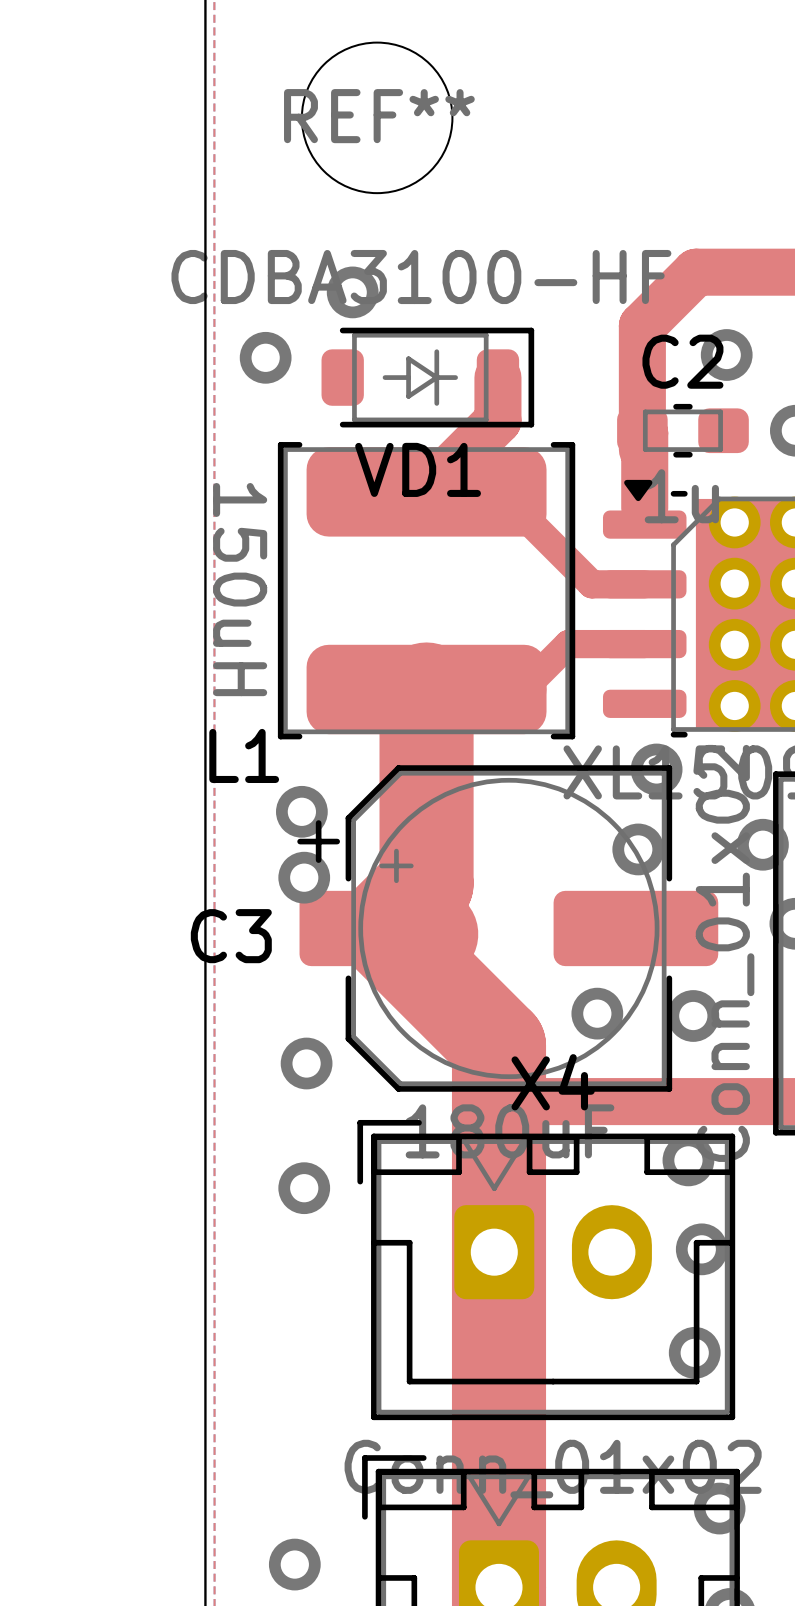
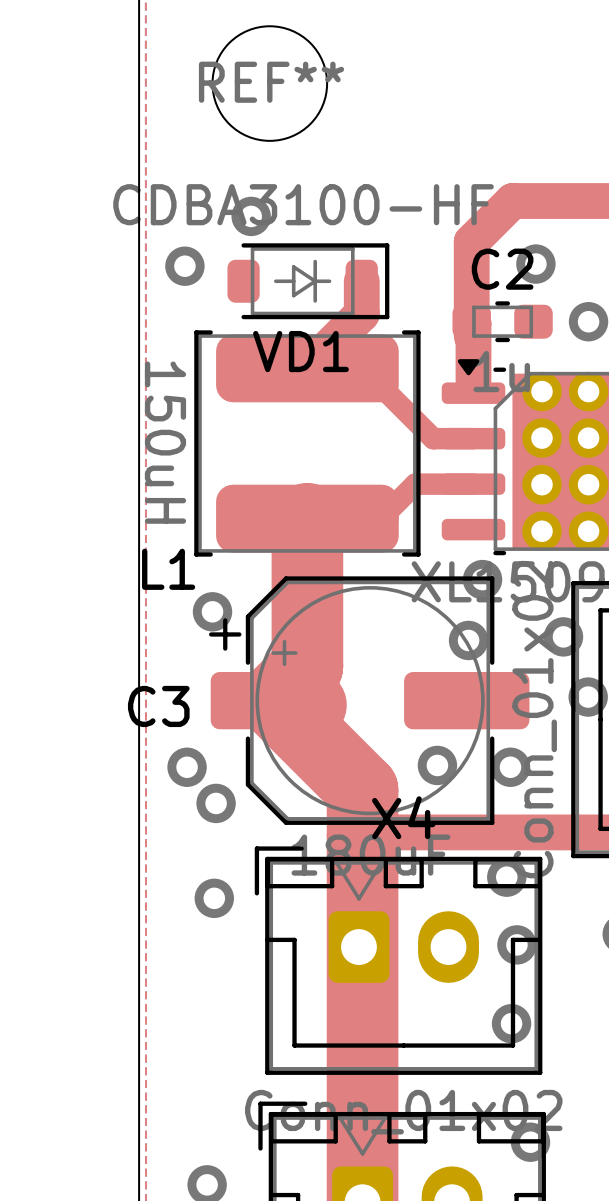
via position: (304, 877) -> (187, 767)

